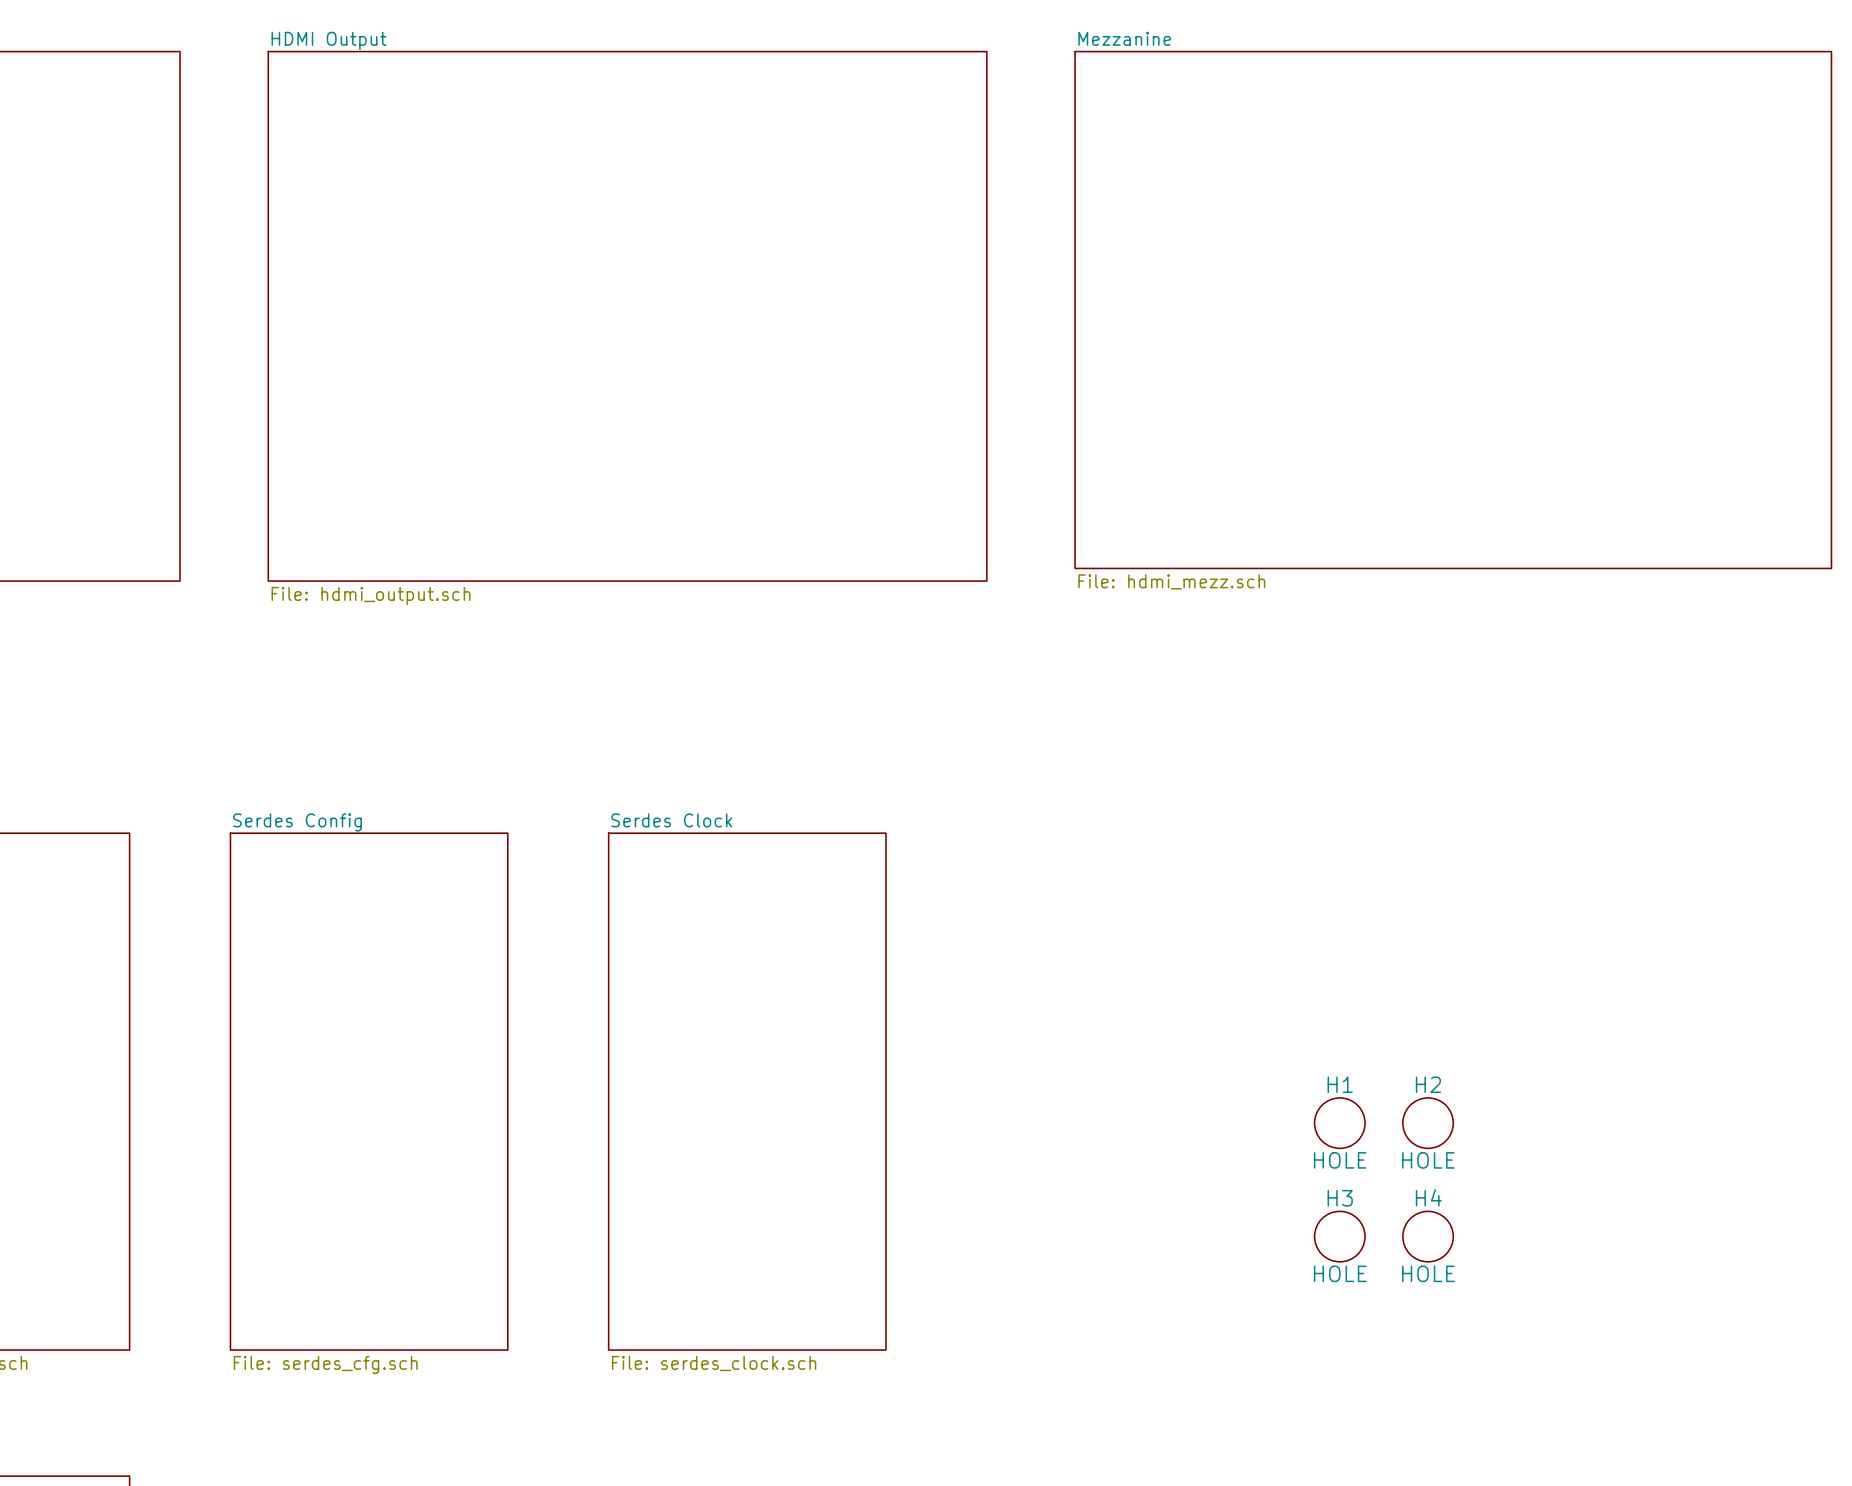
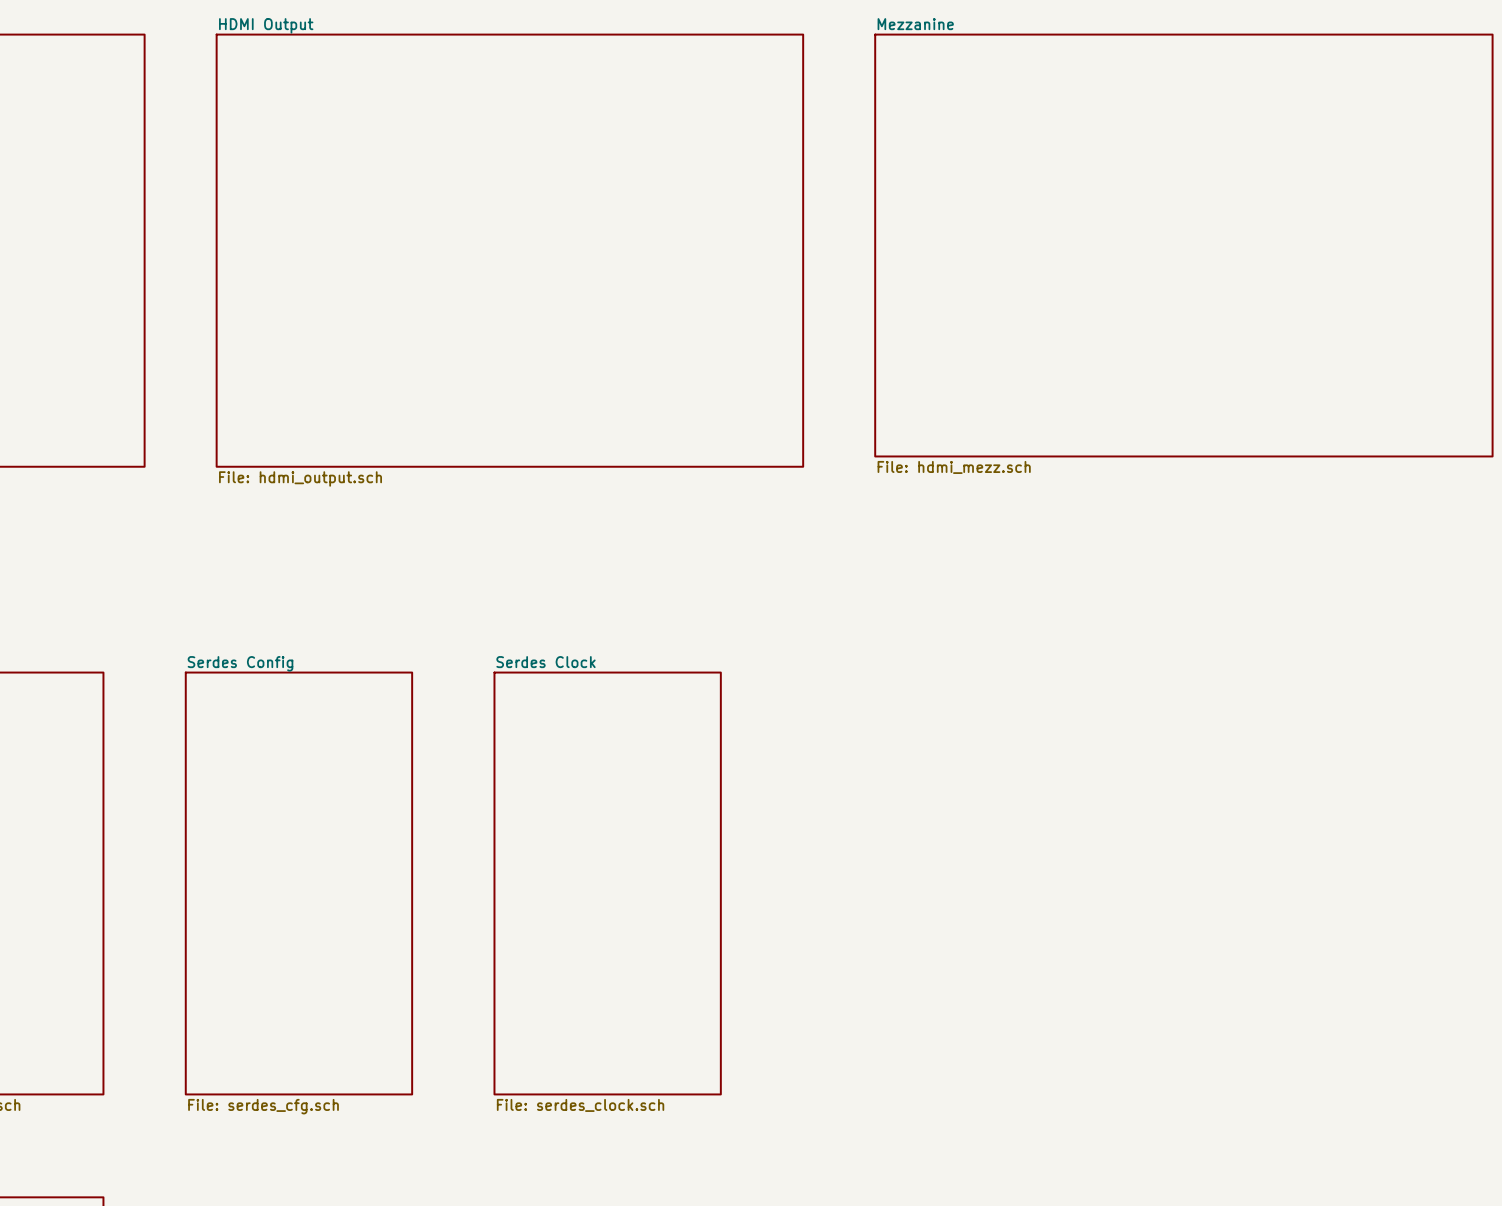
H1: HOLE (1339, 1123) -> none
H2: HOLE (1428, 1123) -> none
H3: HOLE (1339, 1236) -> none
H4: HOLE (1428, 1236) -> none

